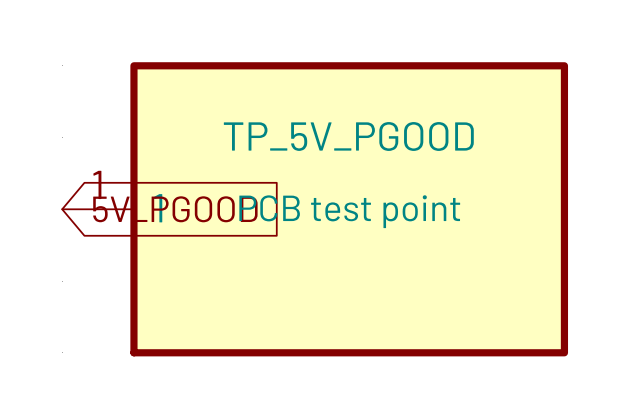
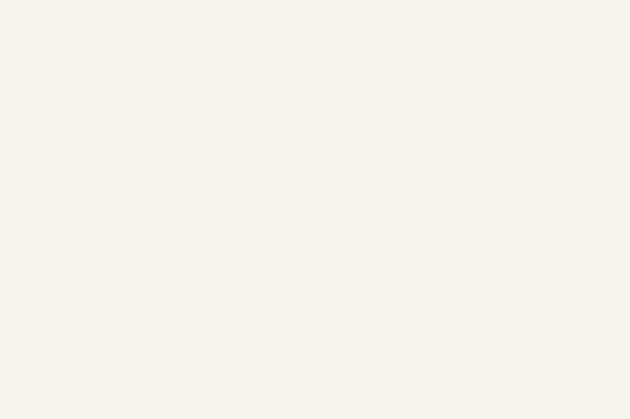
global label: 5V_PGOOD (175, 209) -> none
TP_5V_PGOOD: PCB test point (315, 209) -> none

